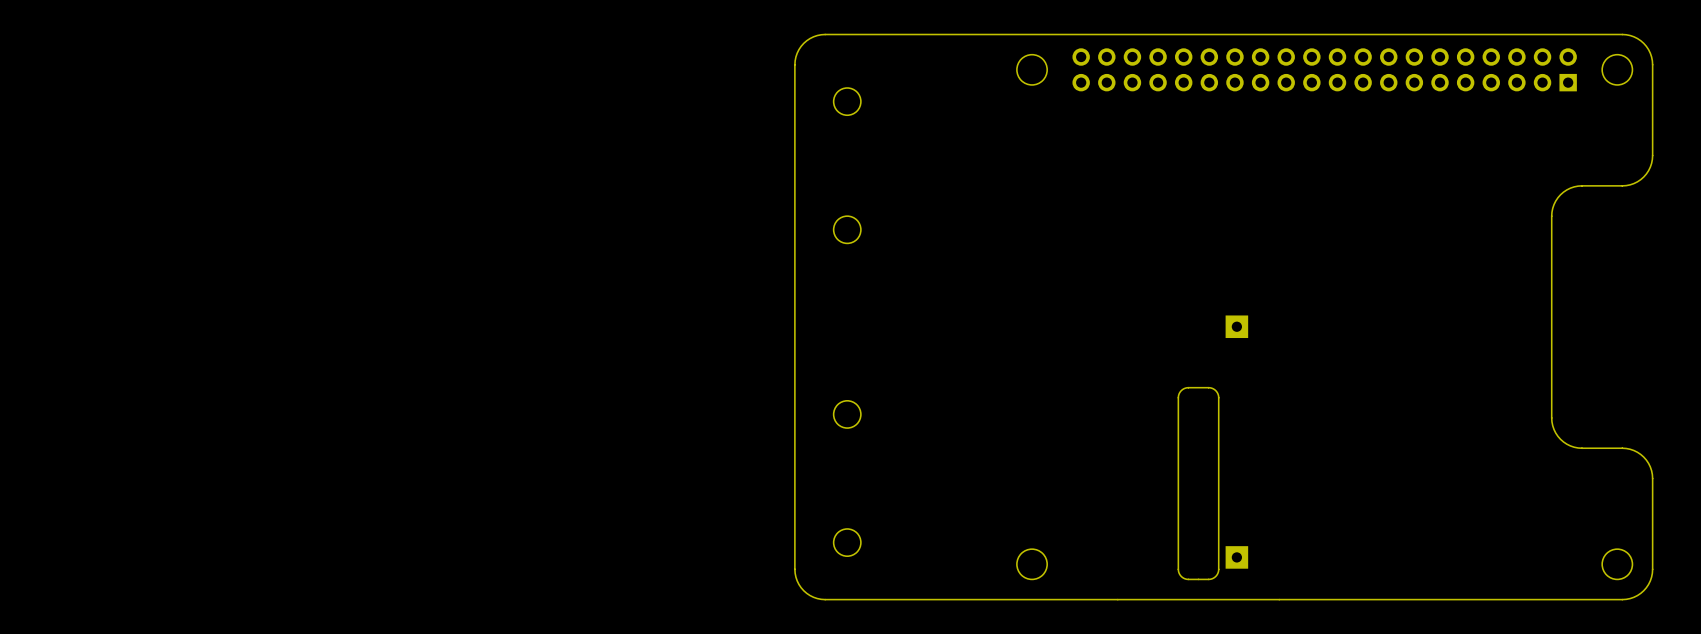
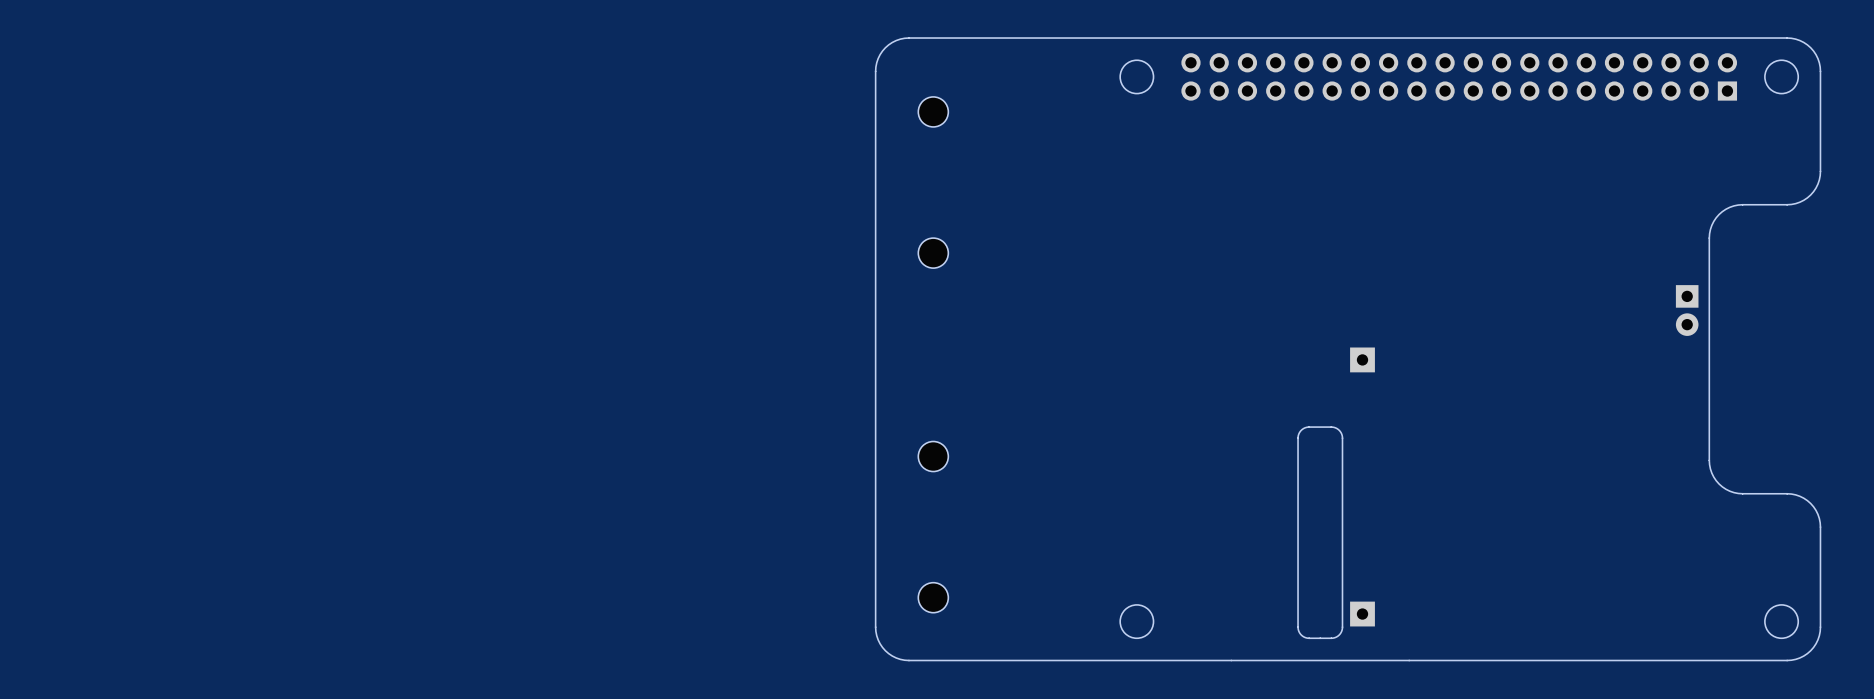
part: none -> (1687, 310)

